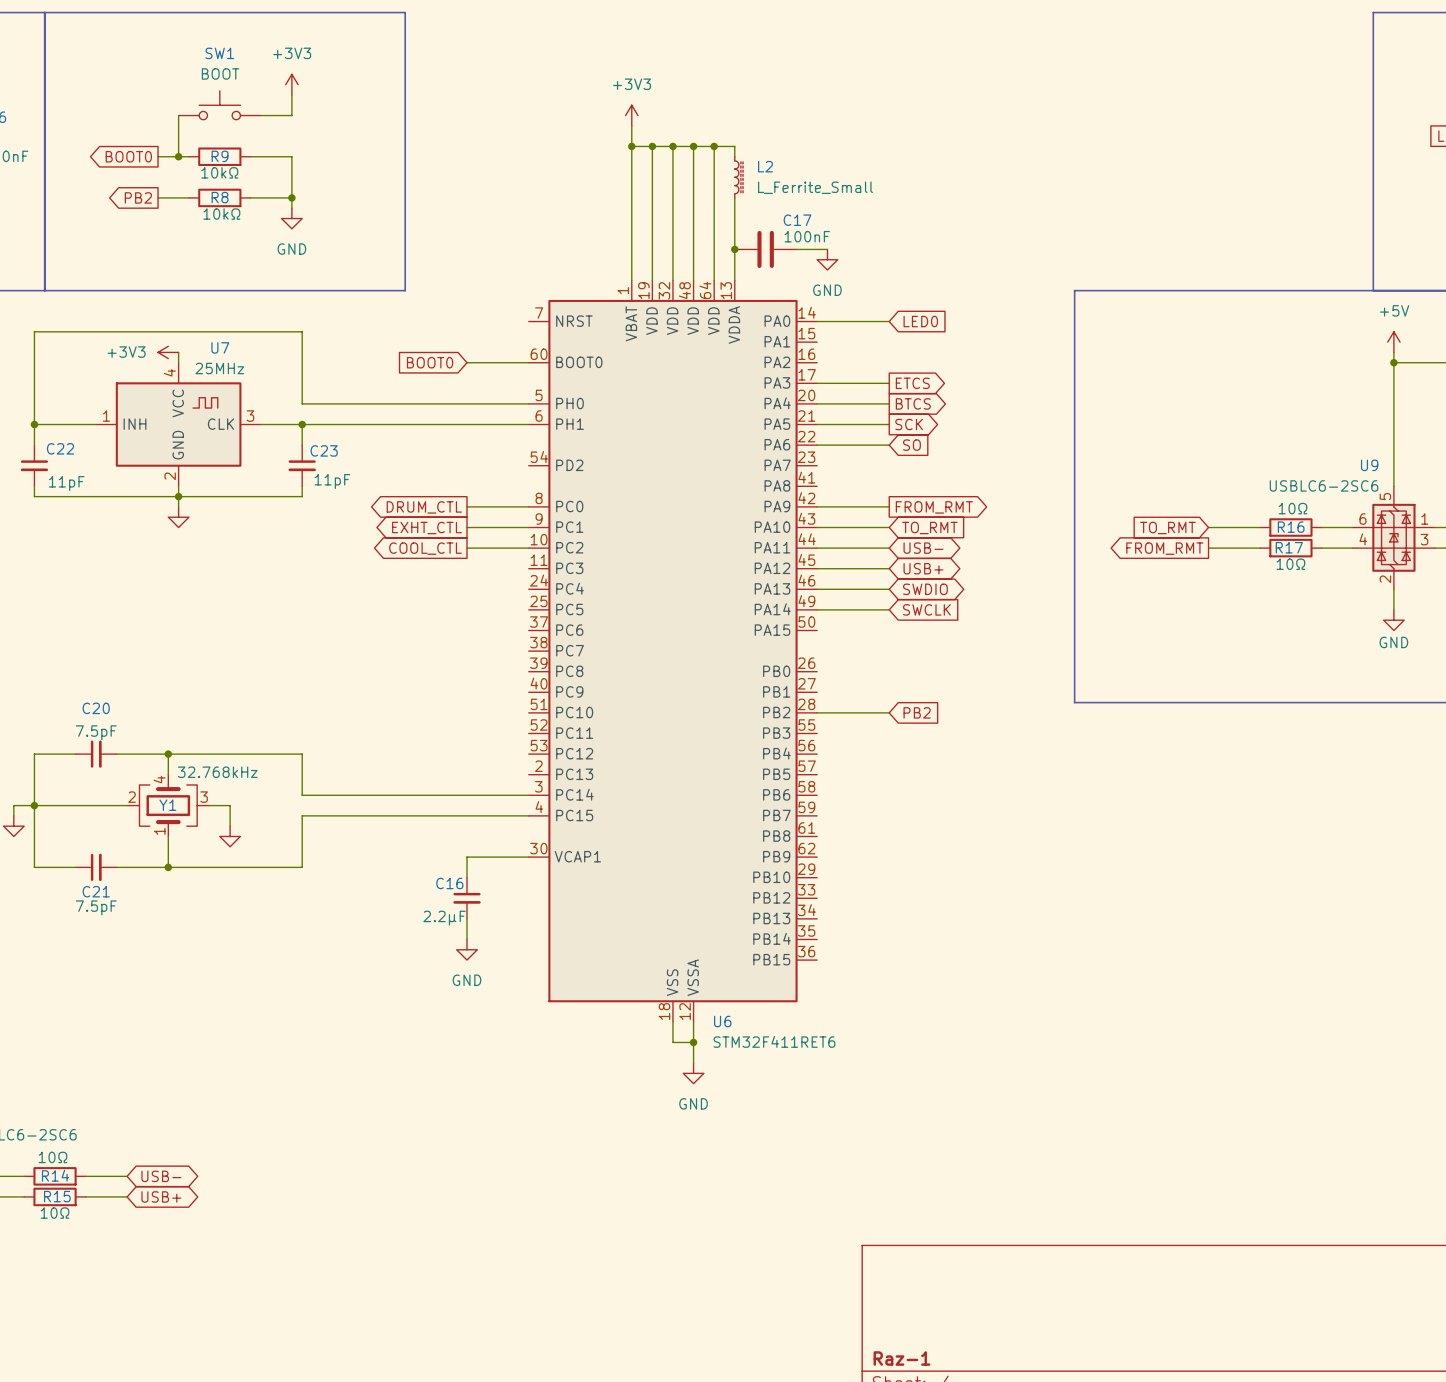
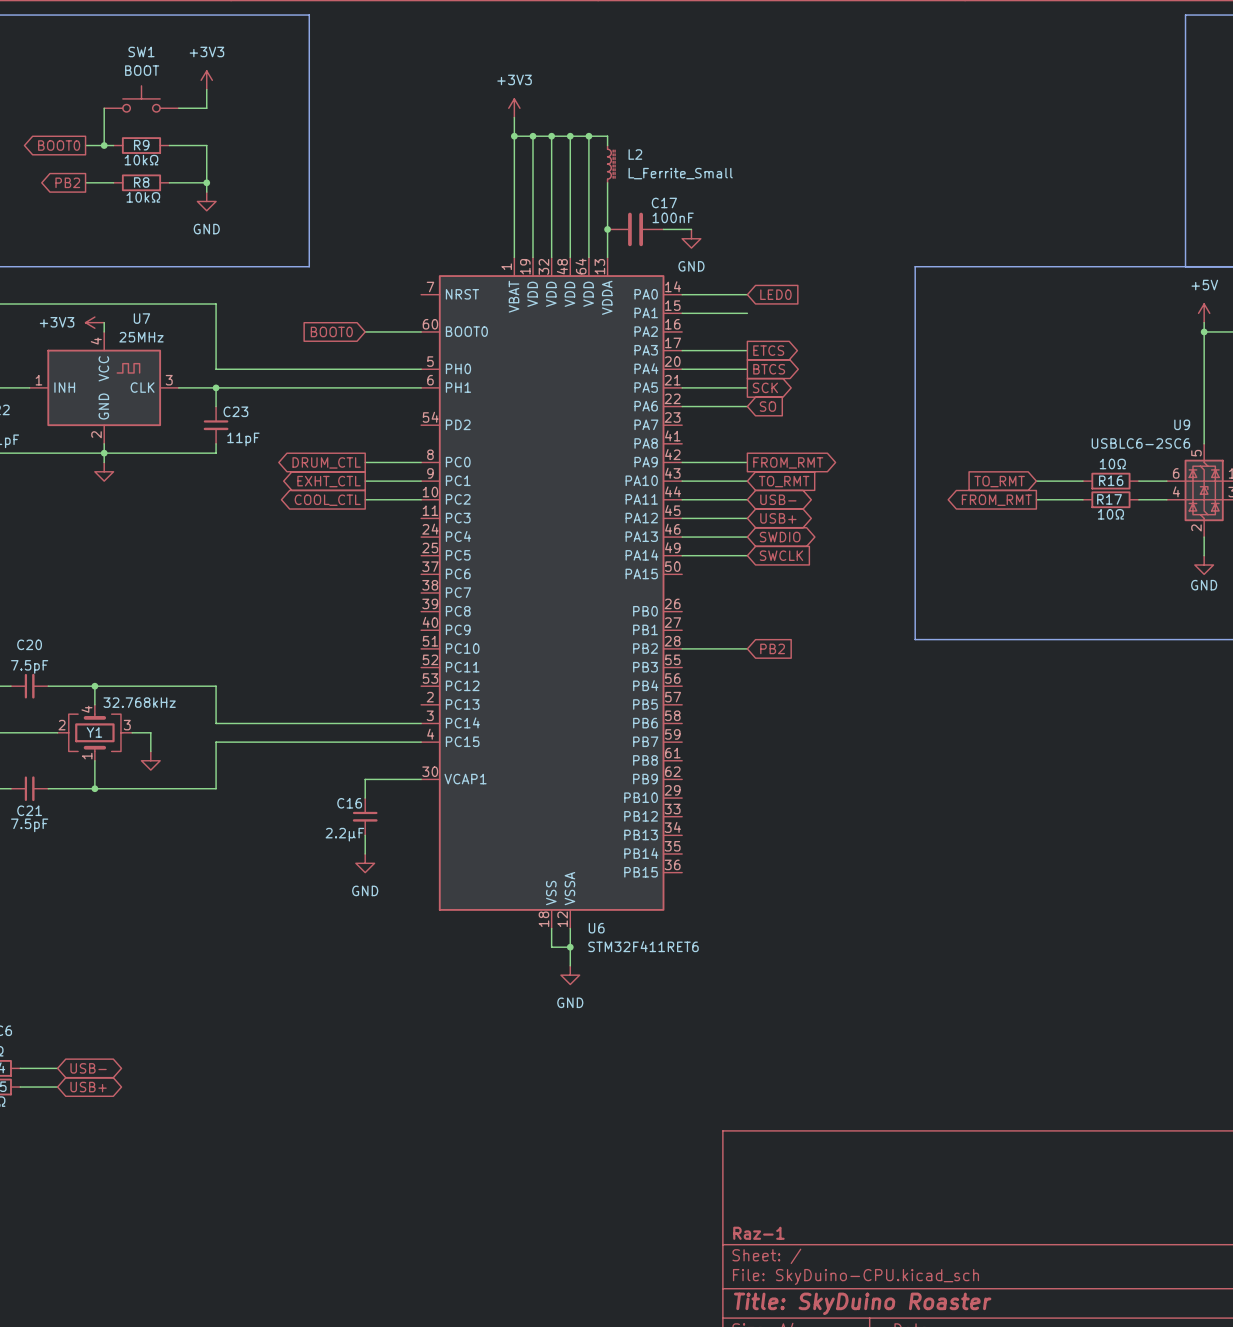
wire: none -> (682, 313) (747, 313)

